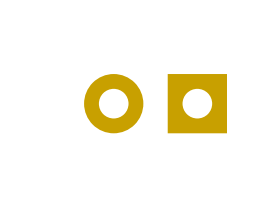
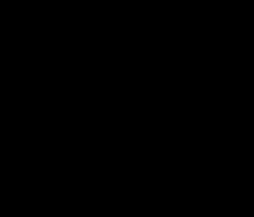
part: (155, 103) -> none

